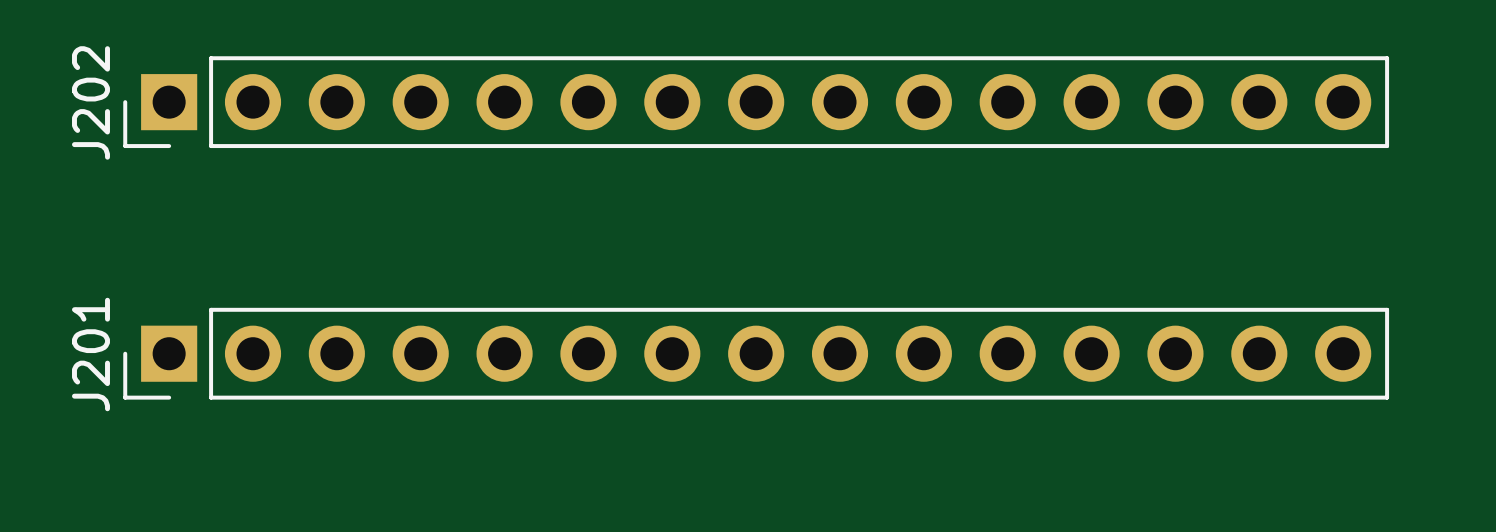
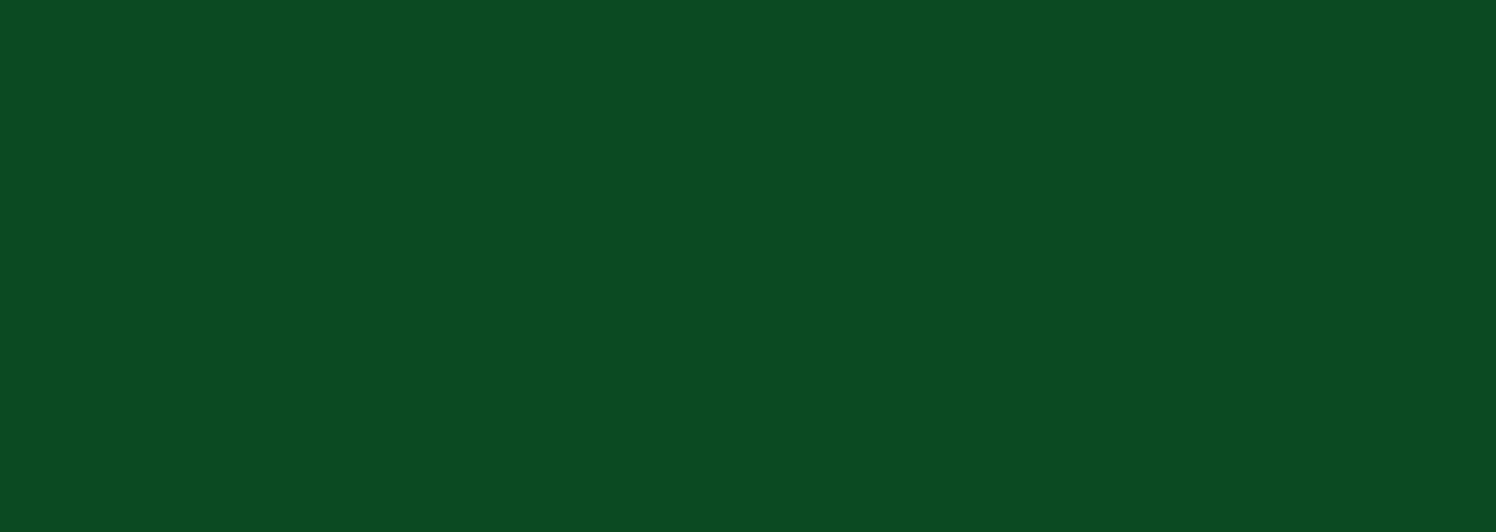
J202: (756, 102) -> none
J201: (756, 353) -> none

